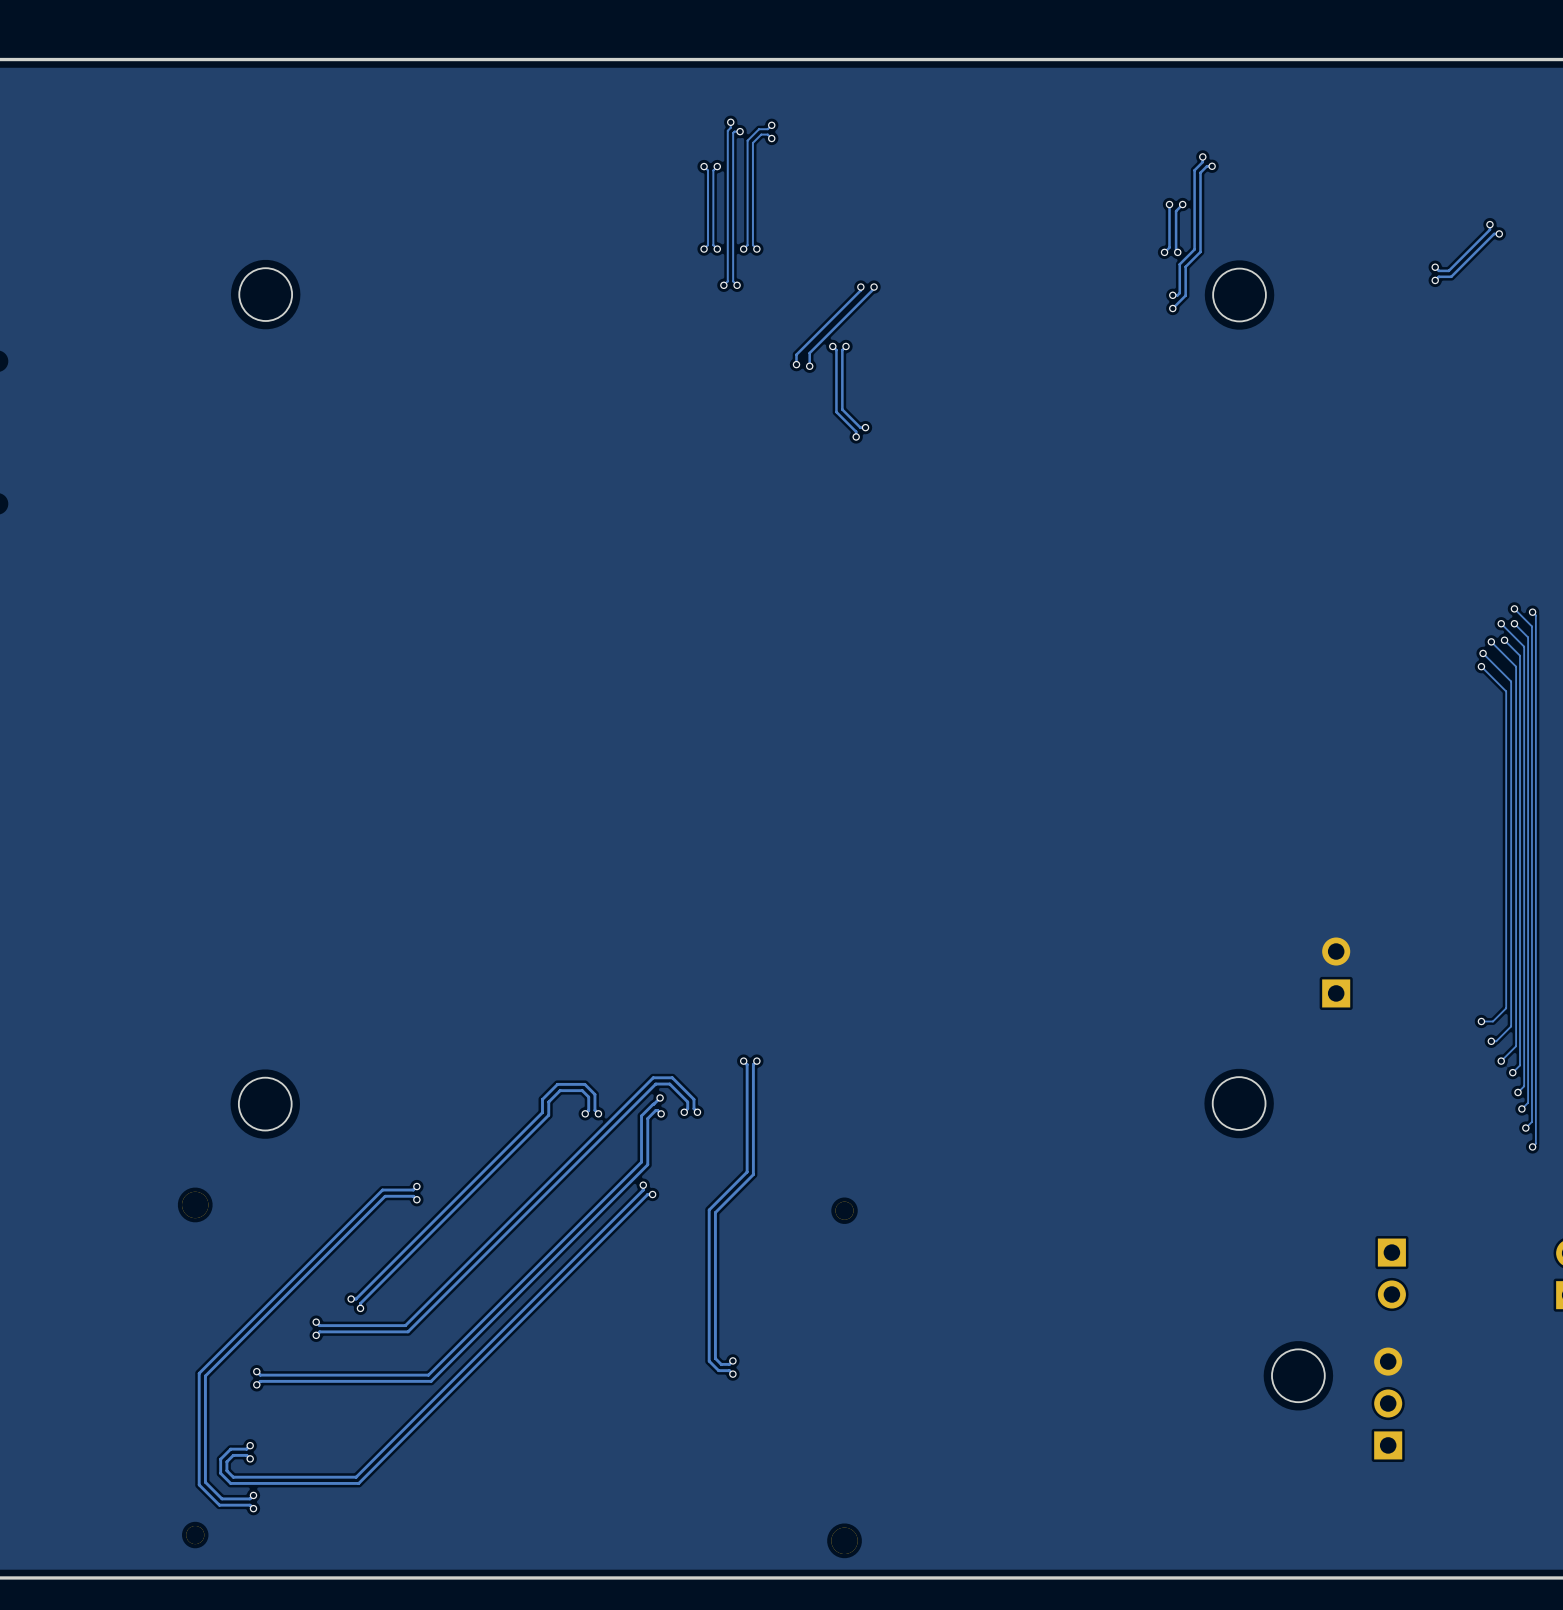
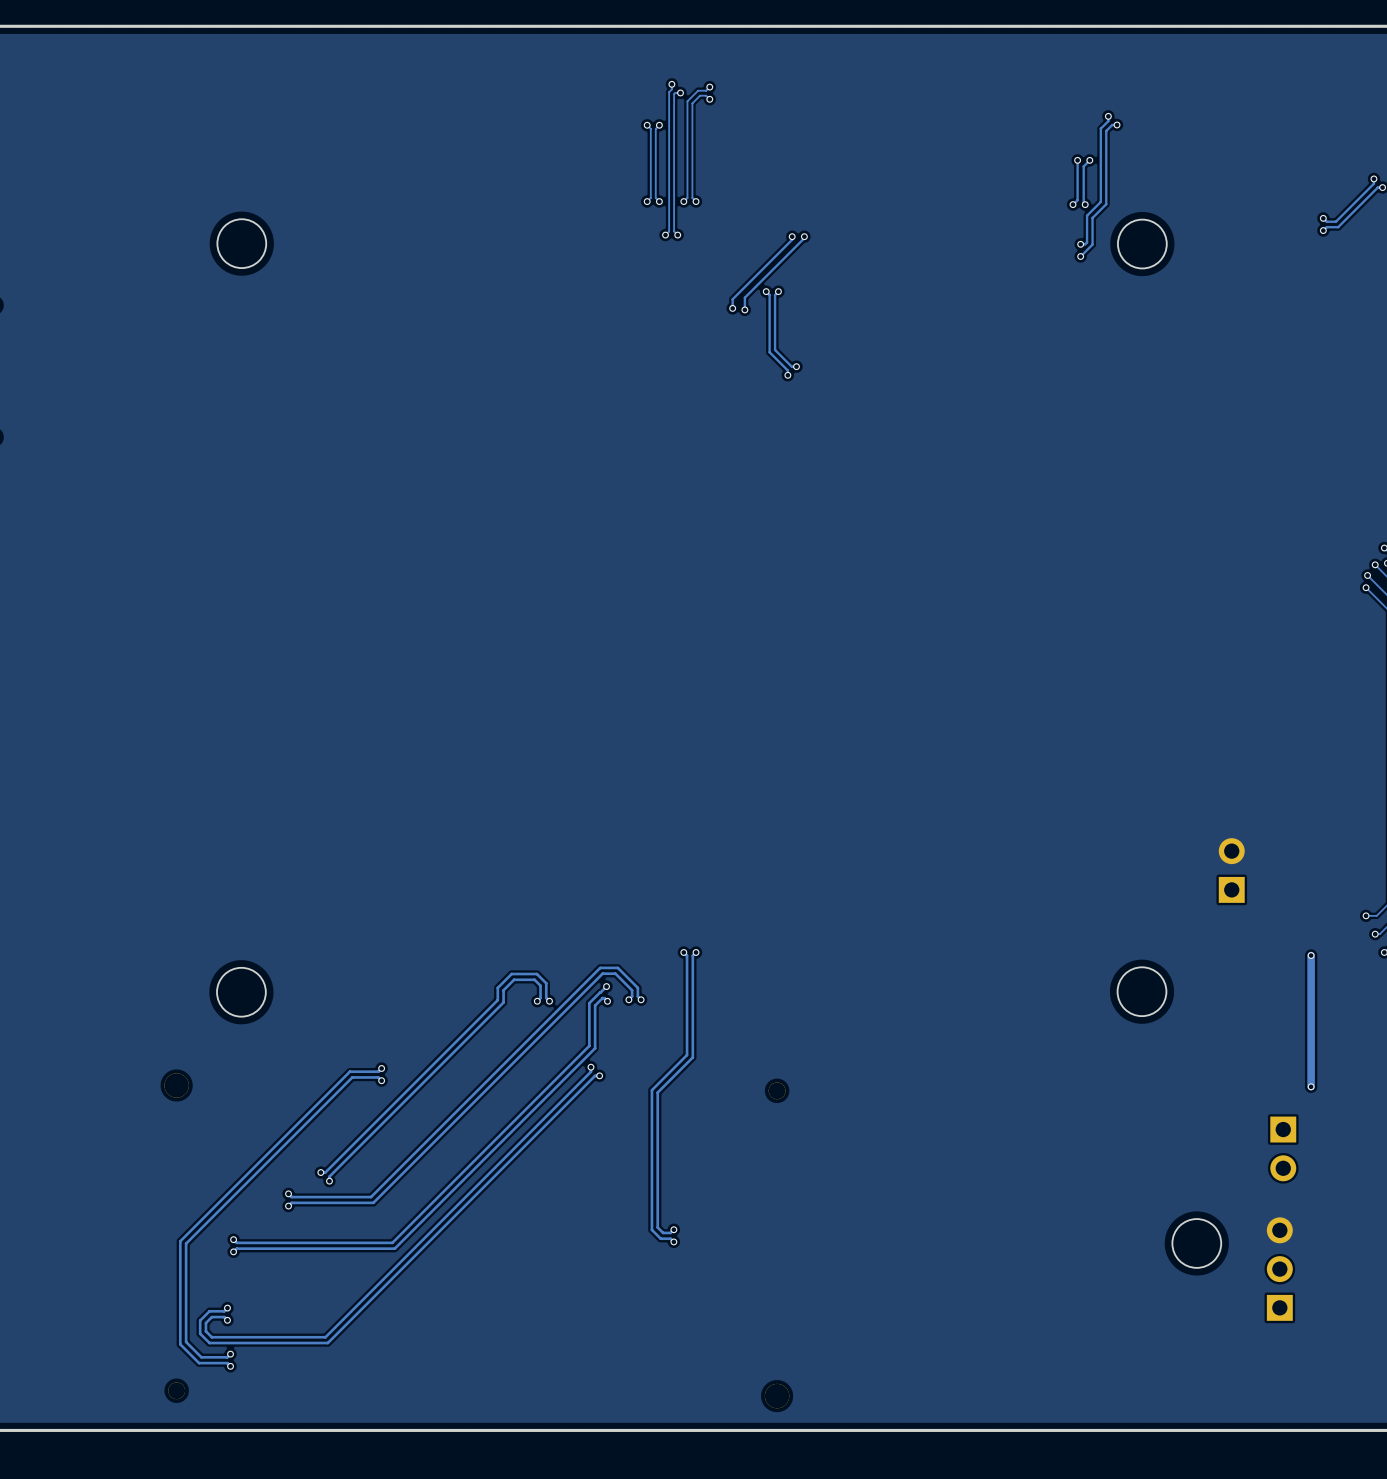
track: none -> (1311, 955) (1311, 1086)
via: none -> (1311, 955)
via: none -> (1311, 1086)

